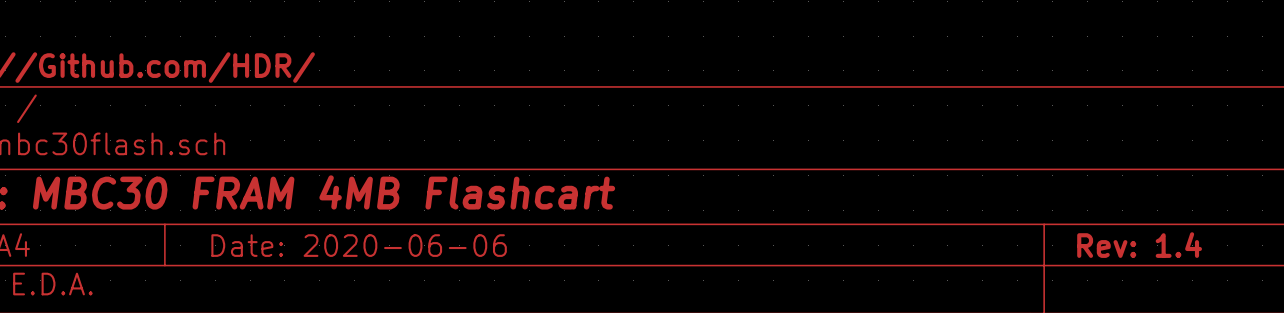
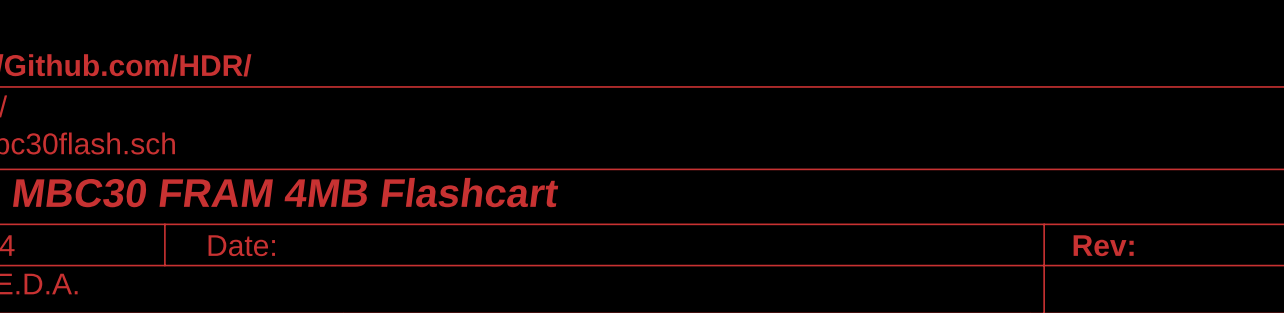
title block: Date: 2020-06-06 (359, 245) -> Date: (241, 245)
title block: Rev: 1.4 (1139, 245) -> Rev: (1103, 245)

